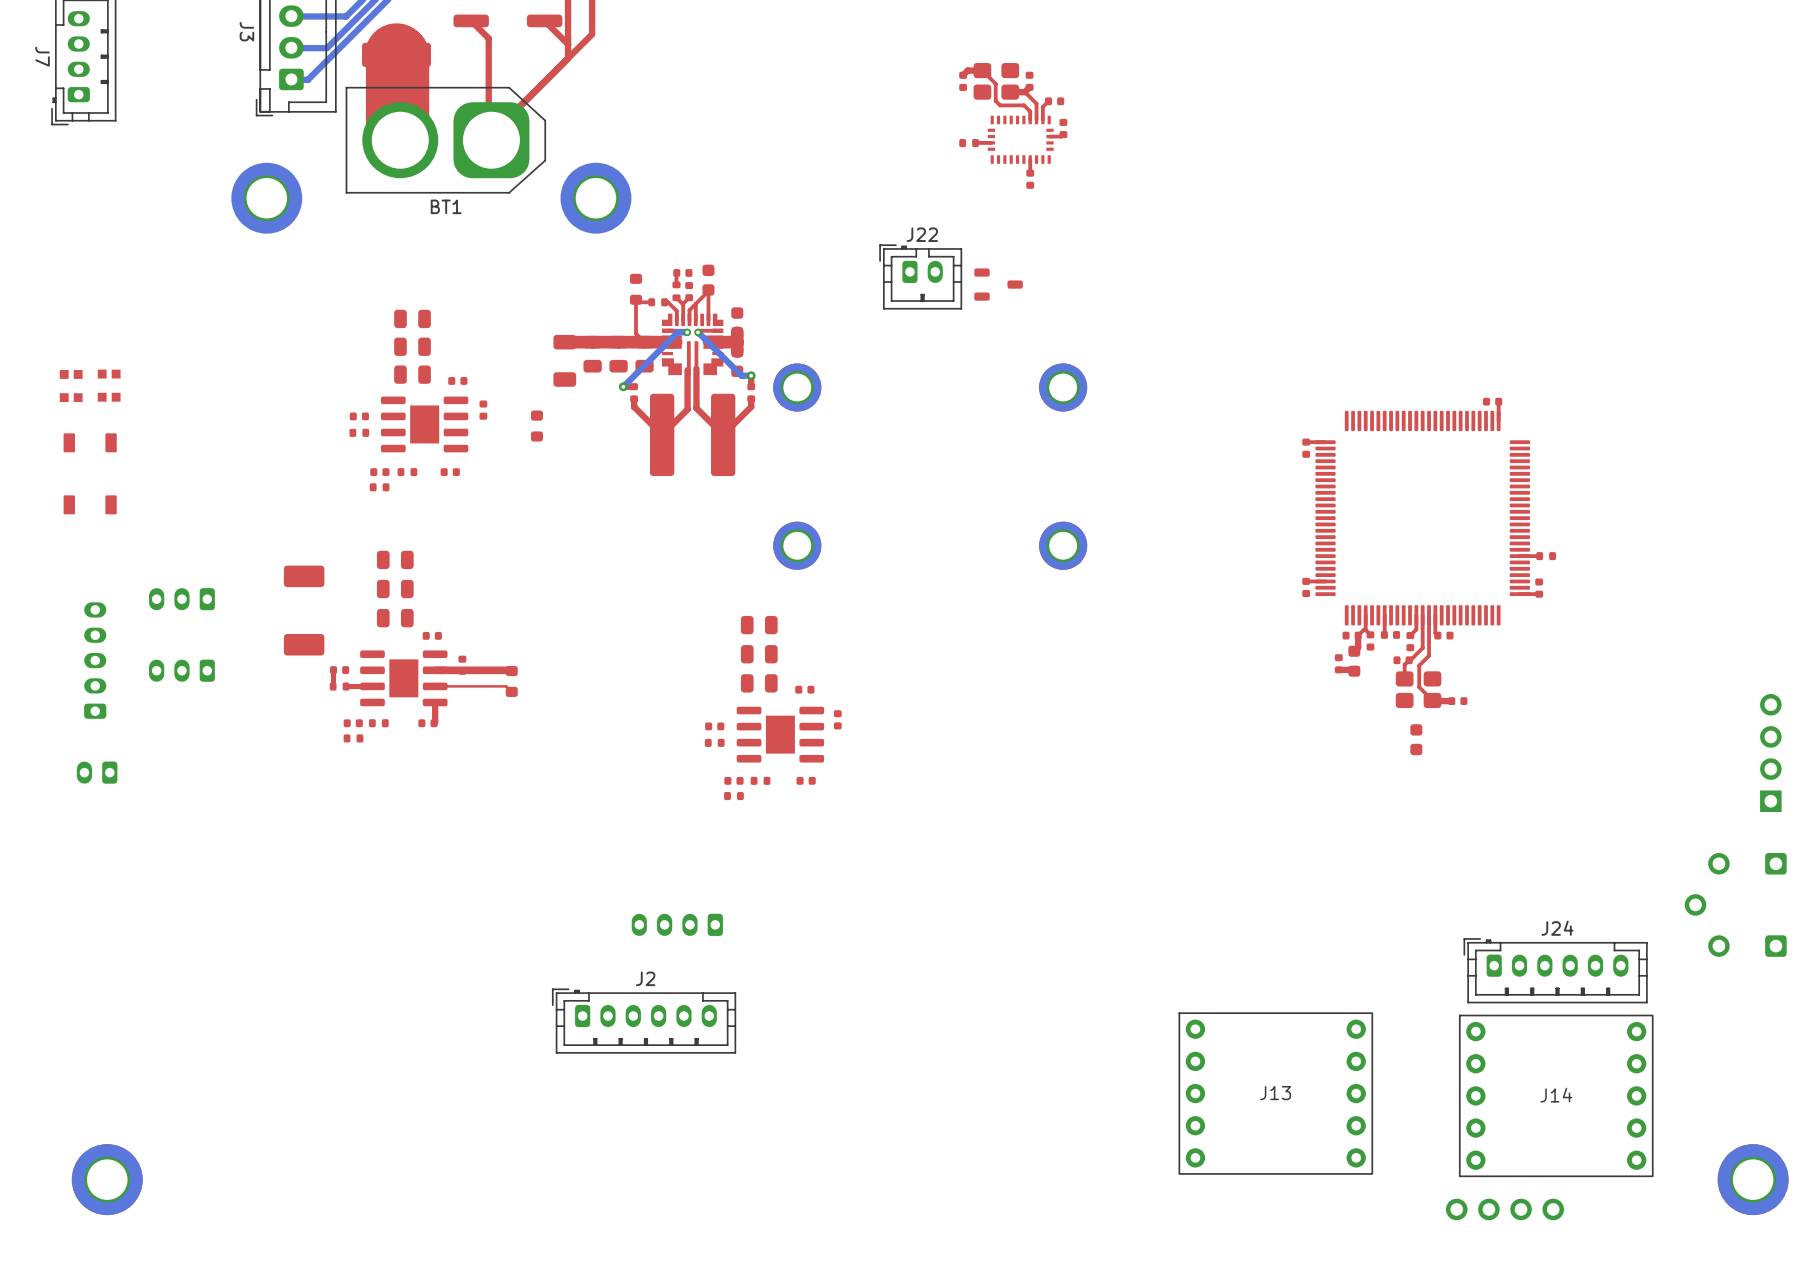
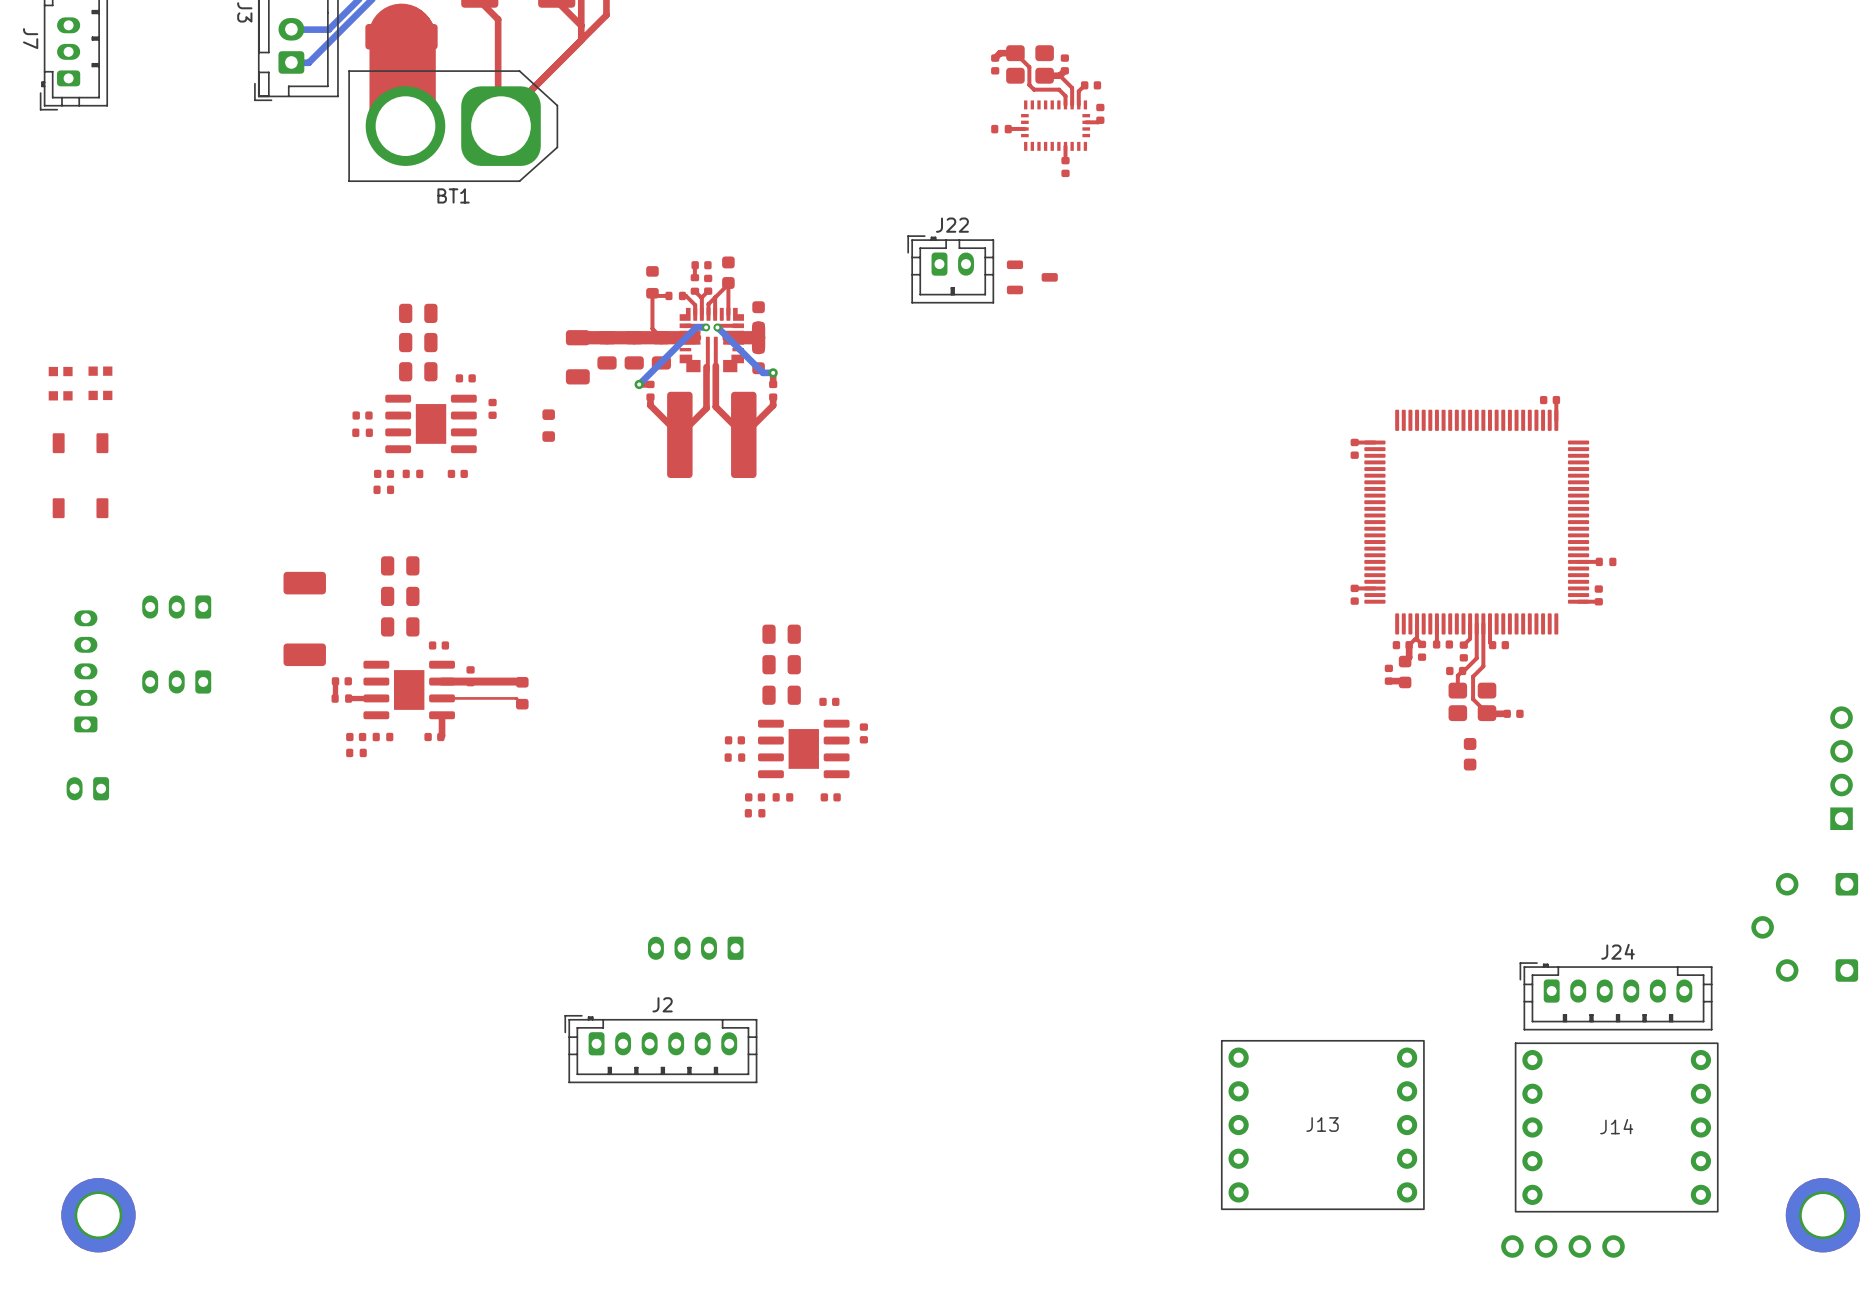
part: (266, 198) -> none
part: (595, 198) -> none
part: (797, 387) -> none
part: (1063, 387) -> none
part: (797, 545) -> none
part: (1063, 545) -> none

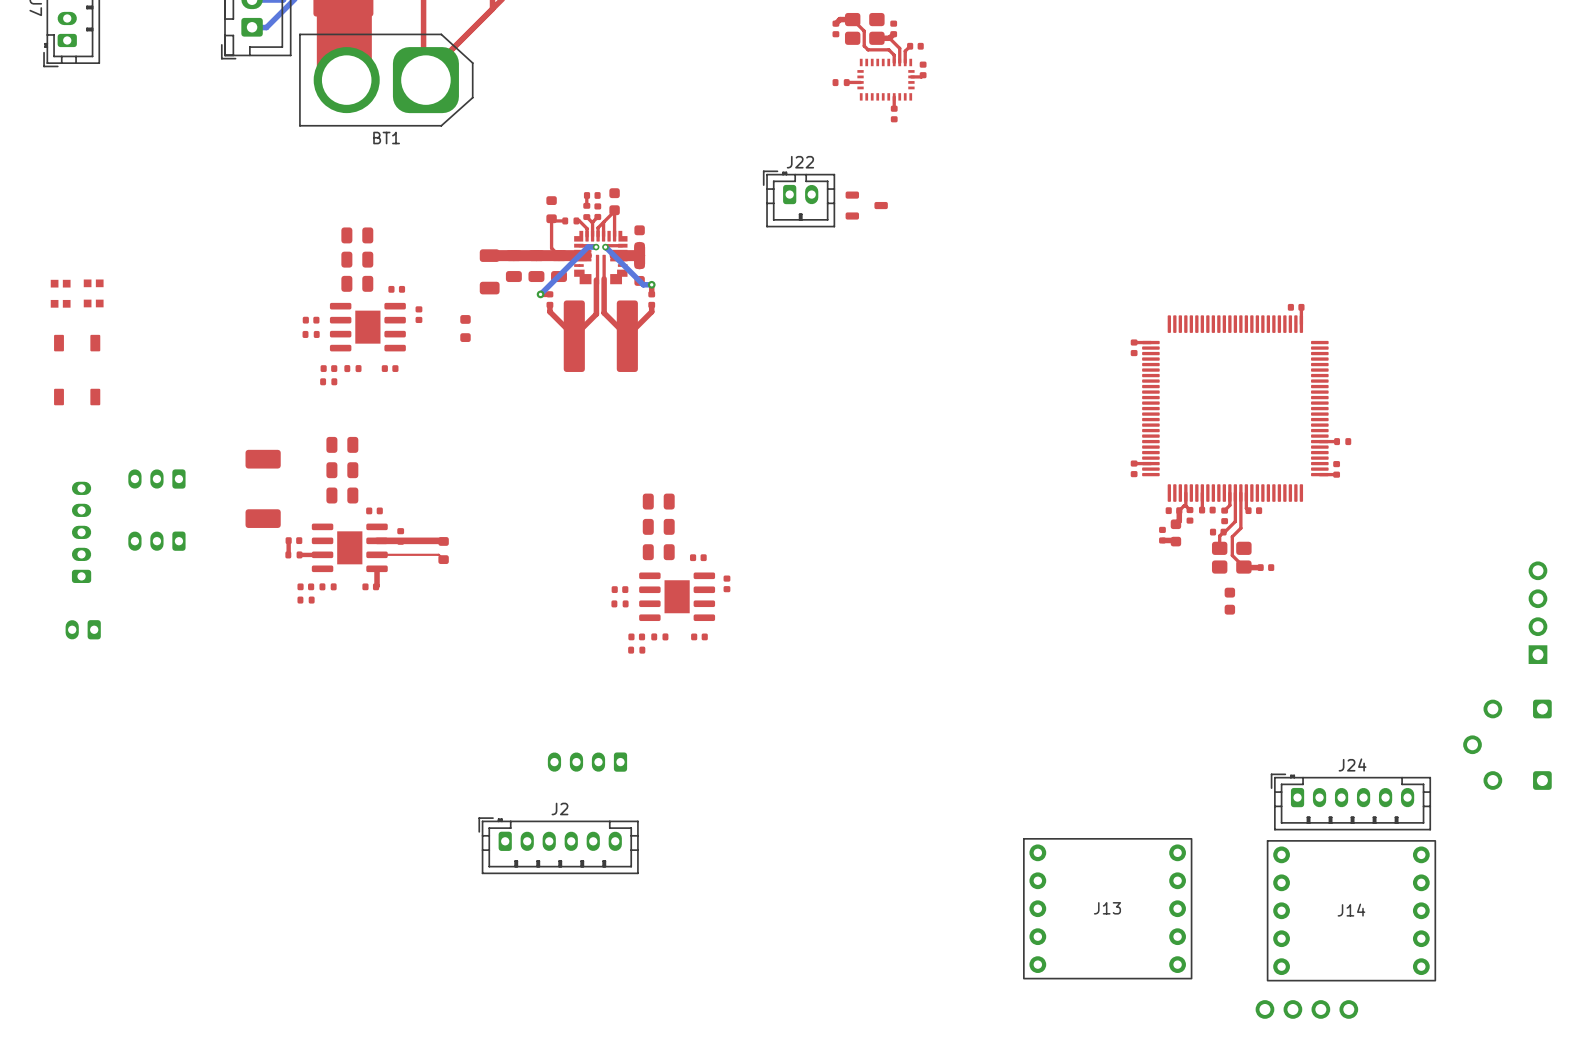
part: (98, 1215) -> none
part: (1822, 1215) -> none

